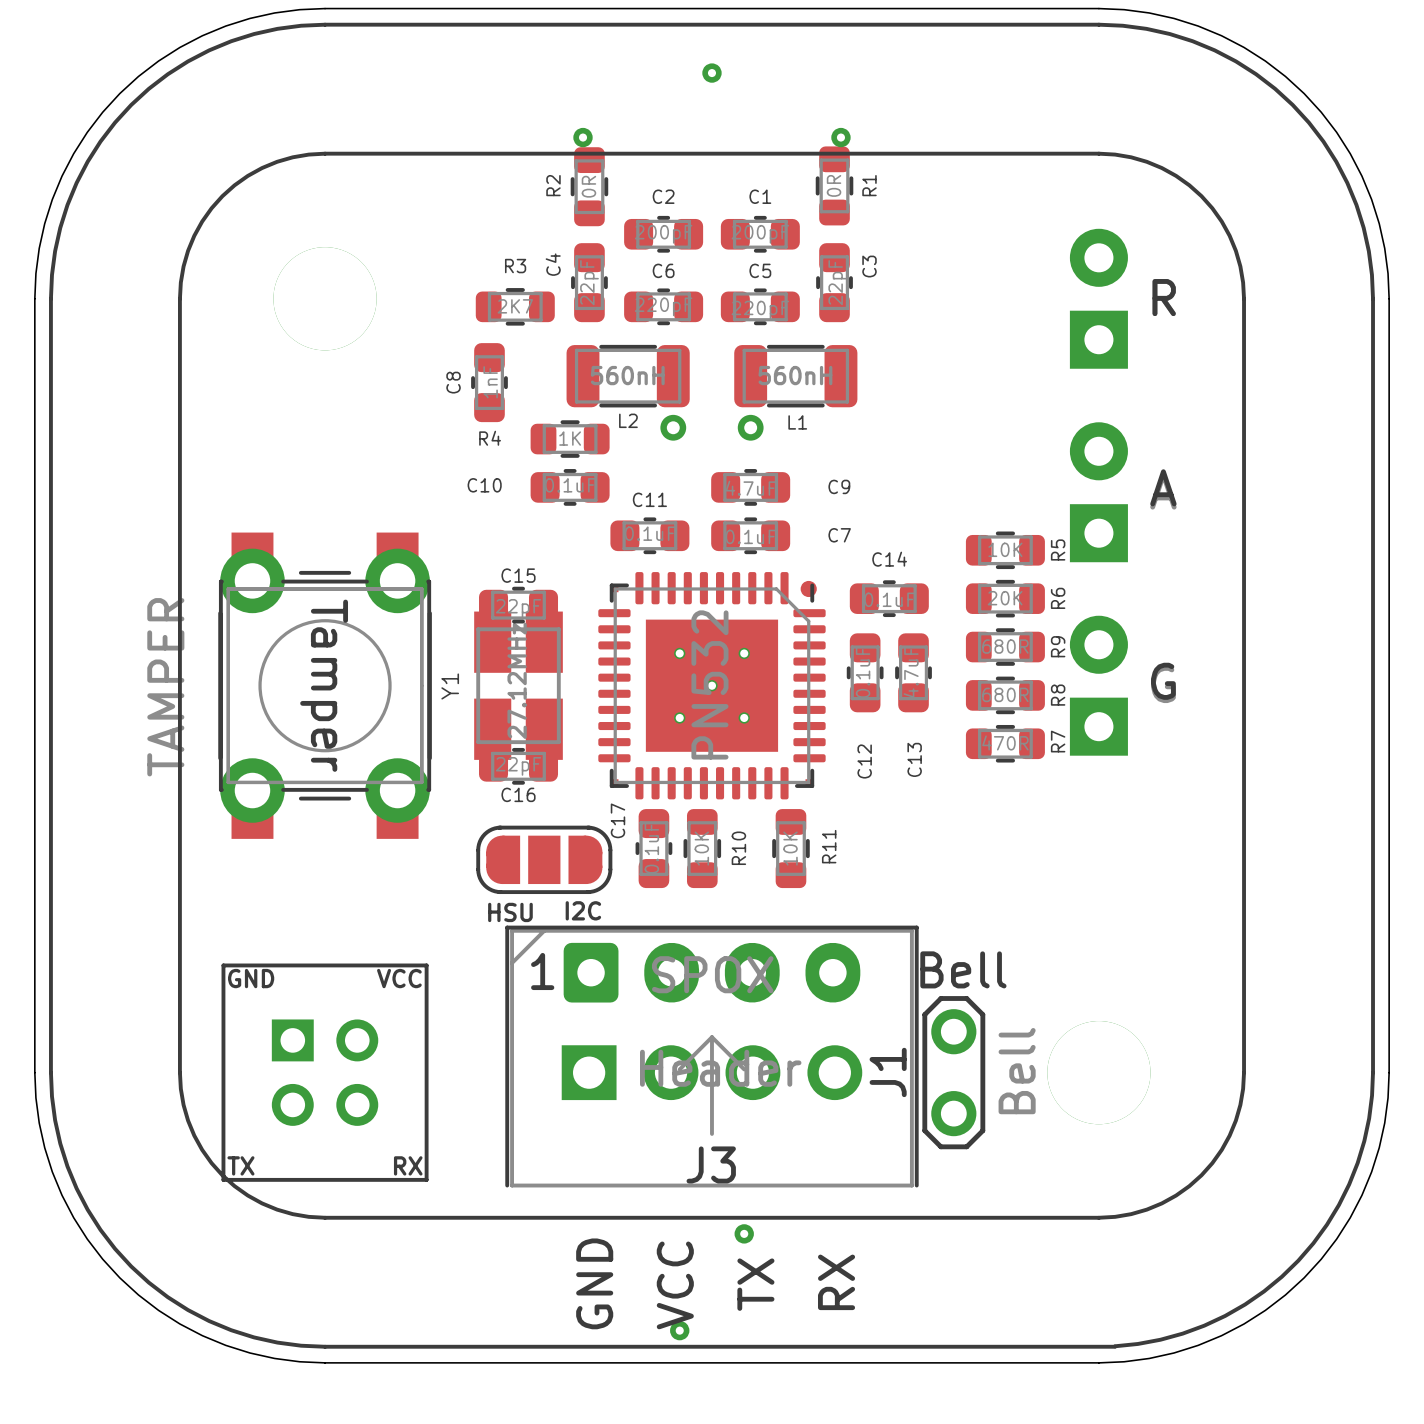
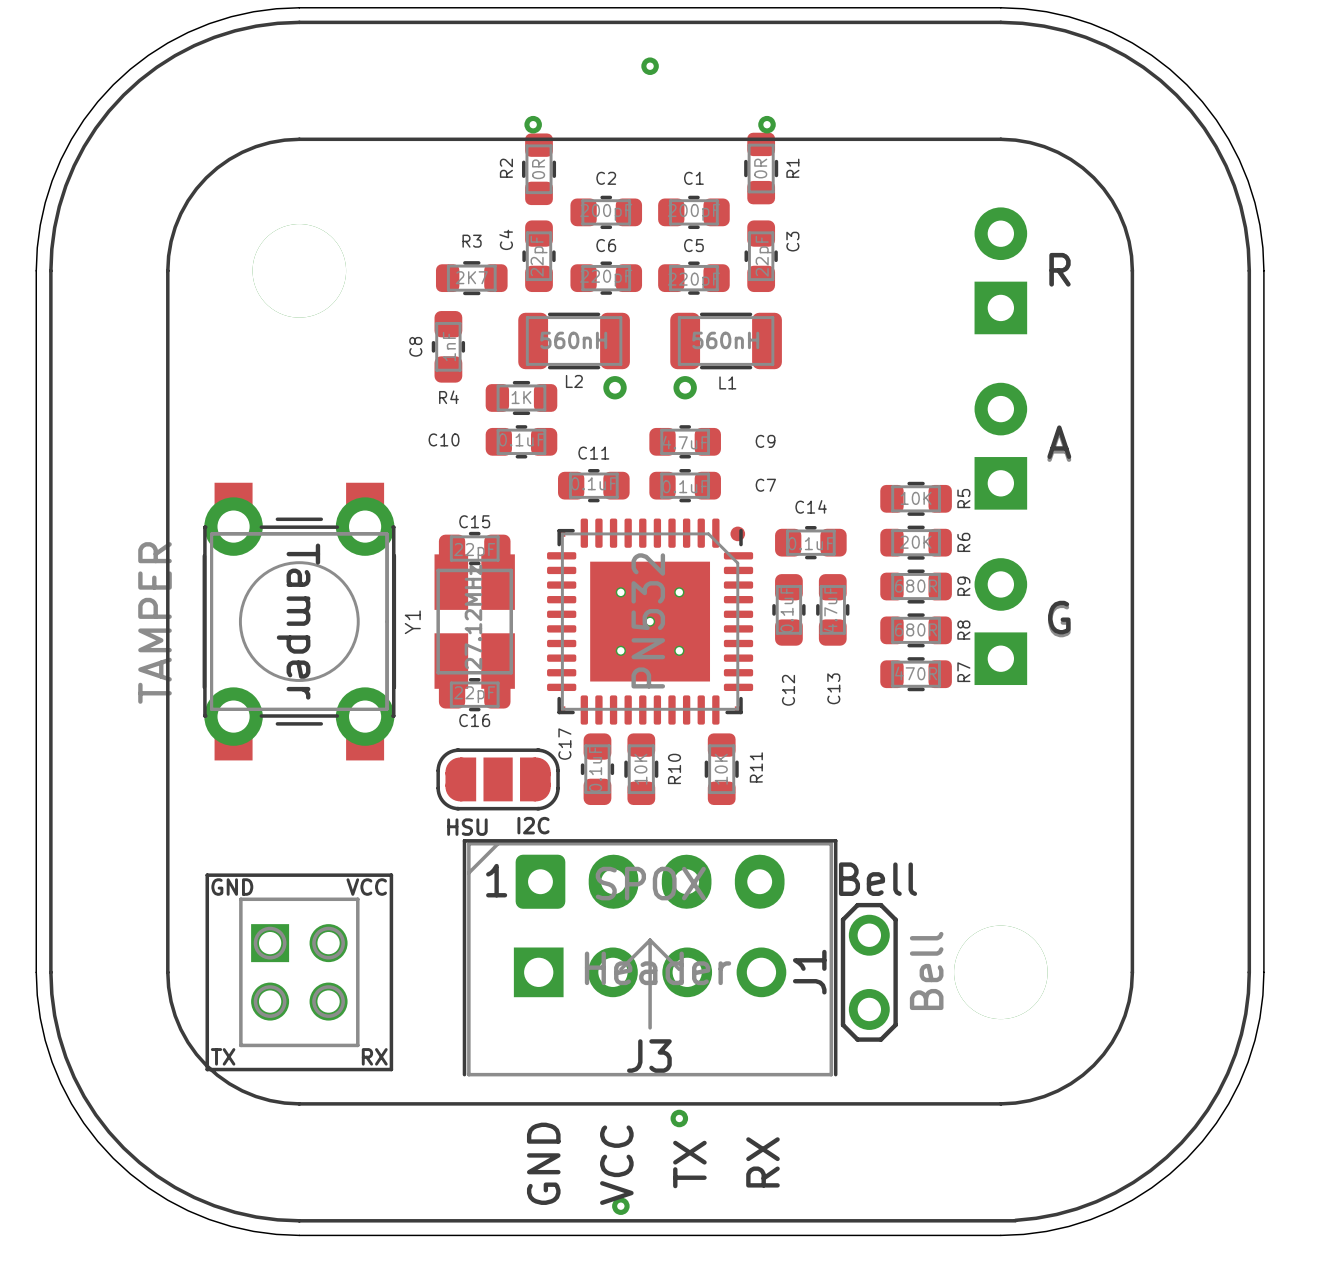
part footprint: [221, 963, 429, 1182] -> [205, 873, 394, 1072]

